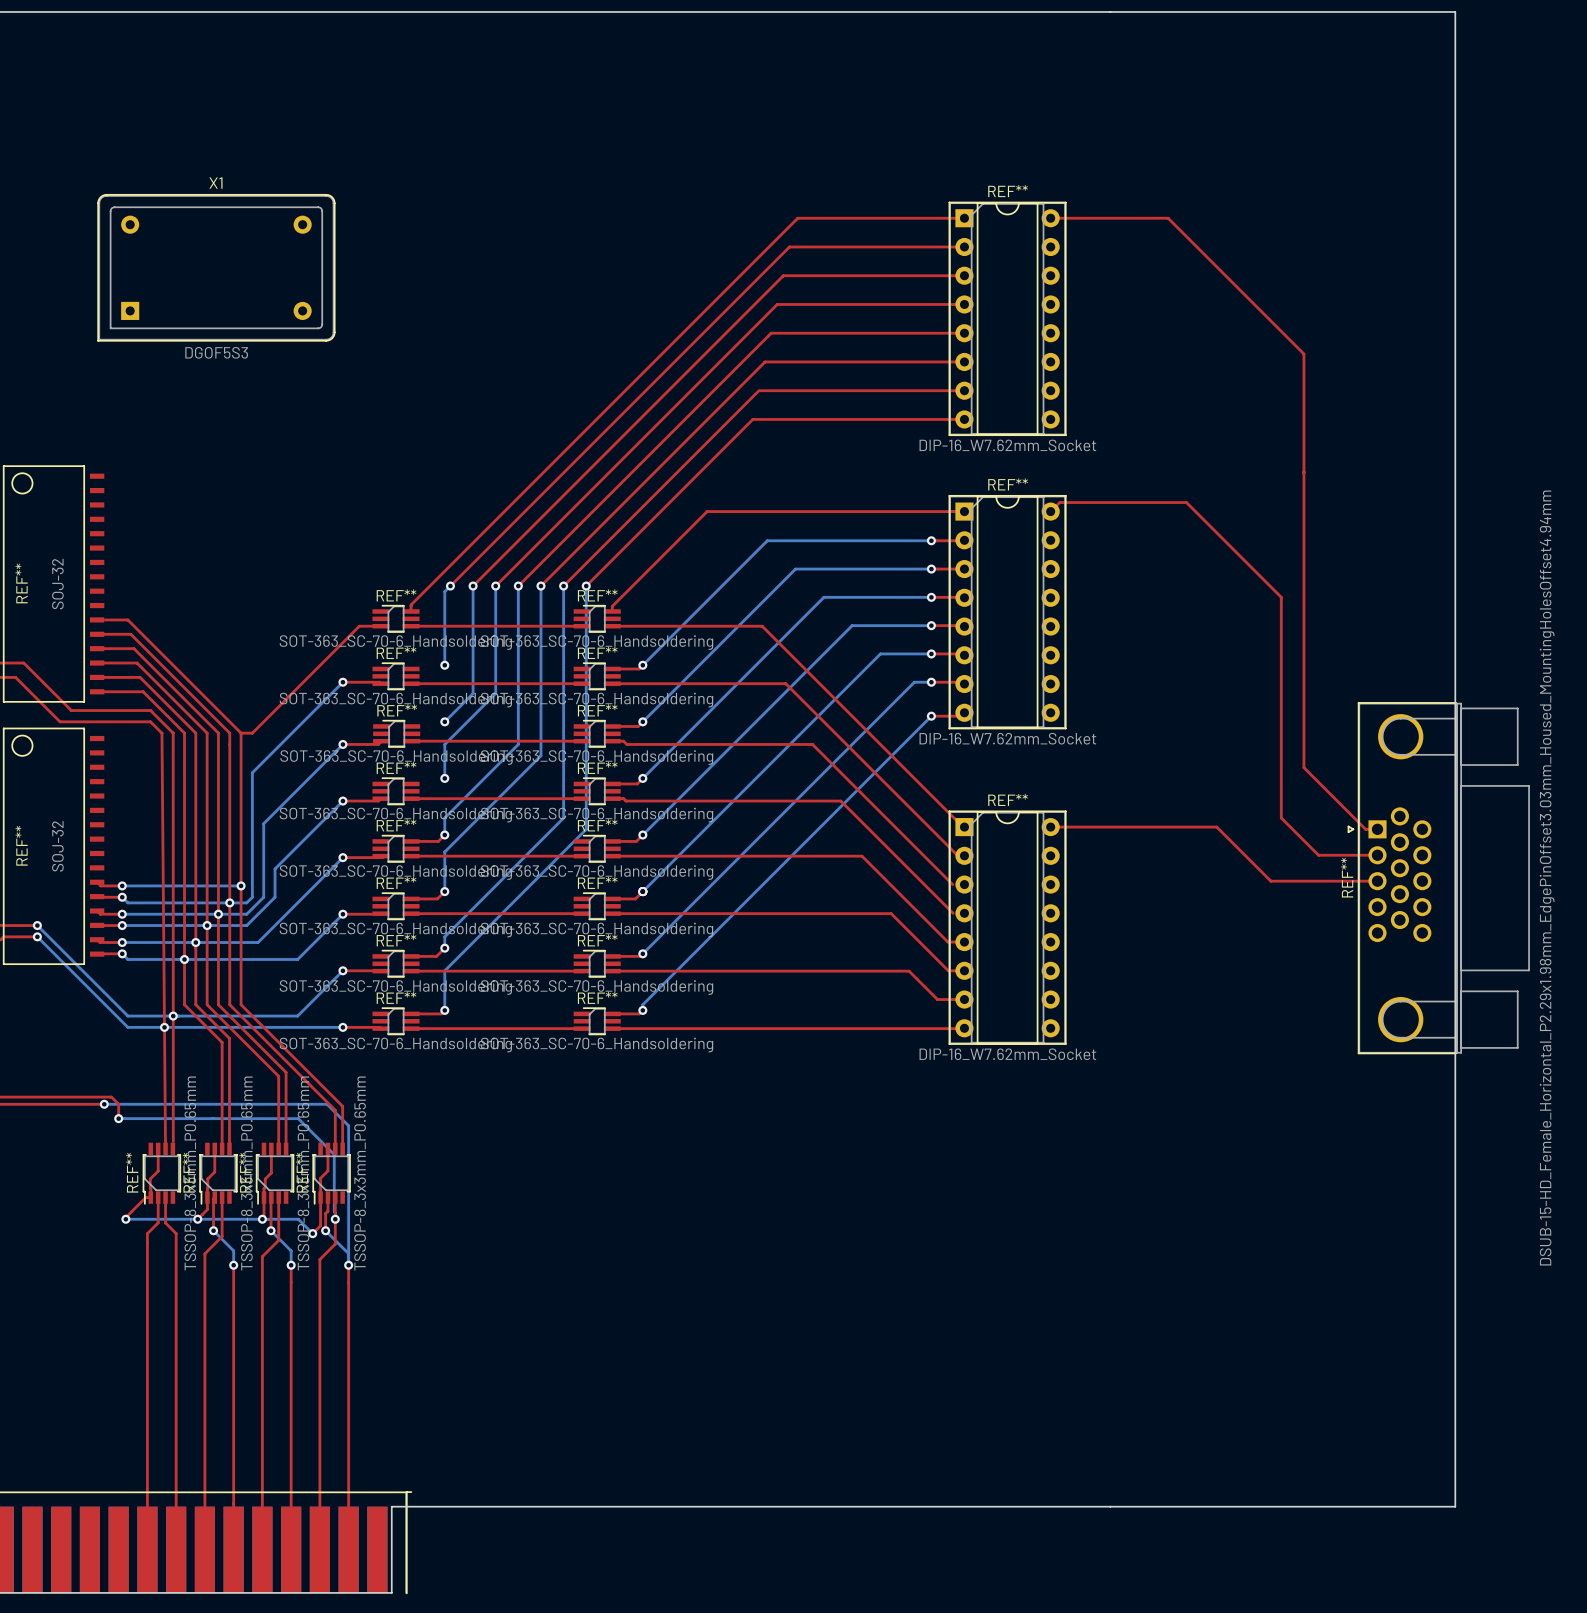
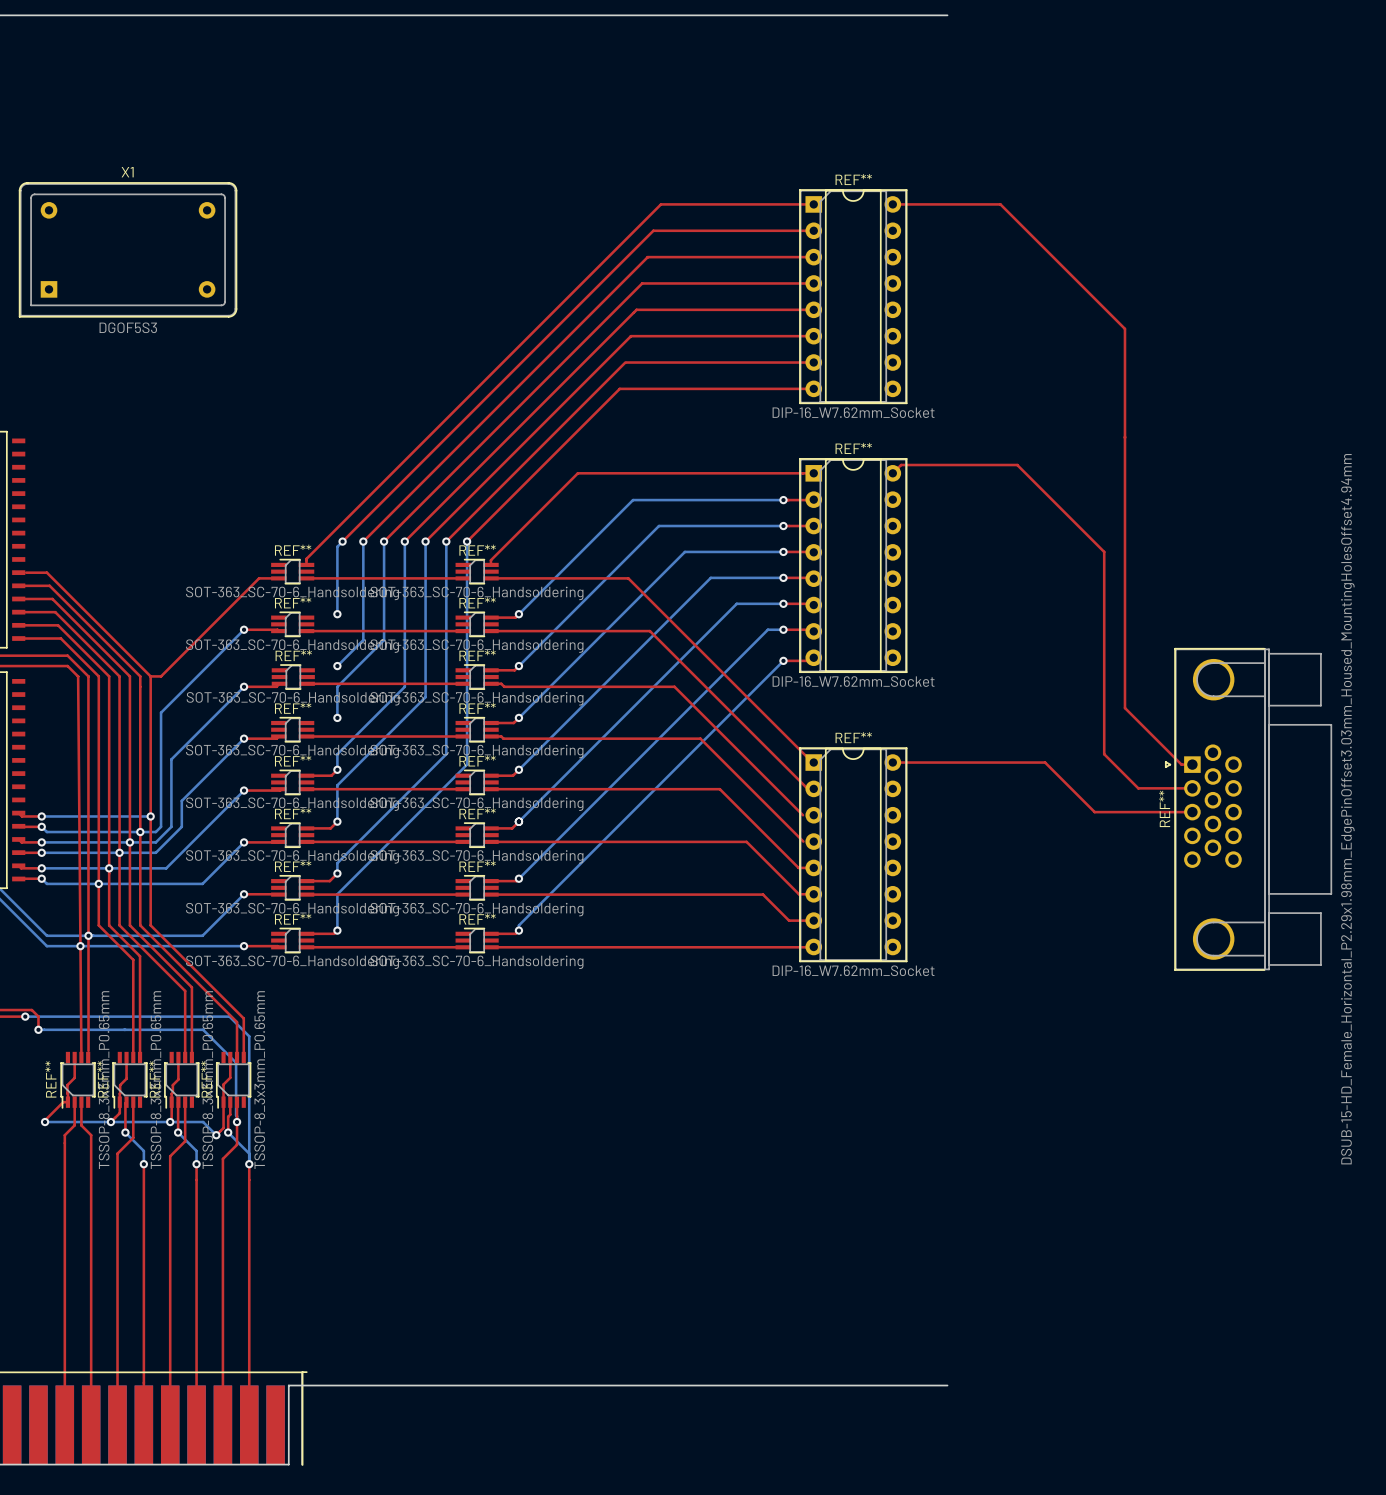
board edge: (1110, 11) (1455, 11) (1455, 1506) (1110, 1506) -> none

